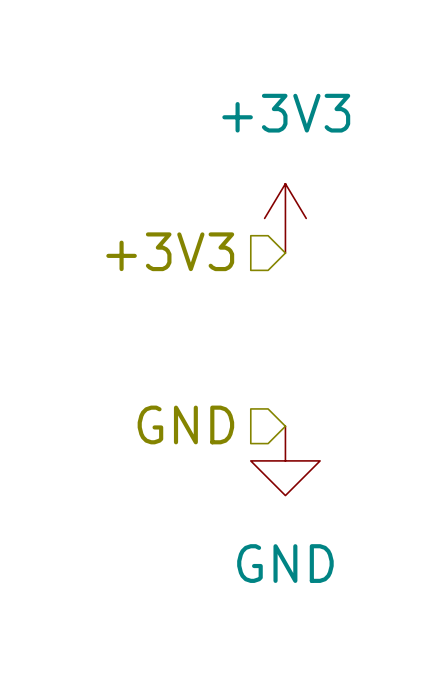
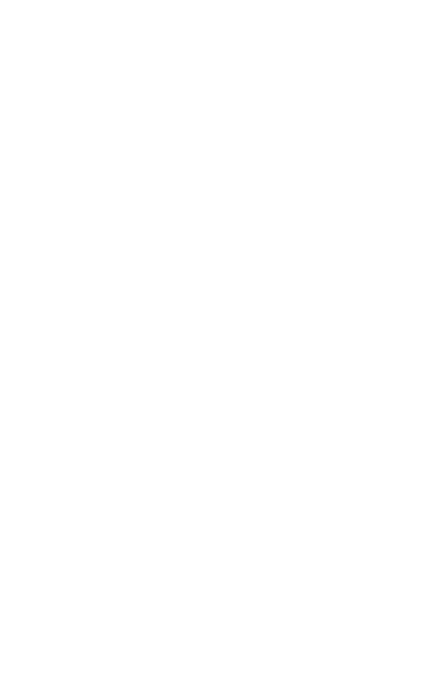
power symbol: +3V3 (285, 218) -> none
hierarchical label: +3V3 (170, 251) -> none
hierarchical label: GND (185, 424) -> none
power symbol: GND (285, 460) -> none

